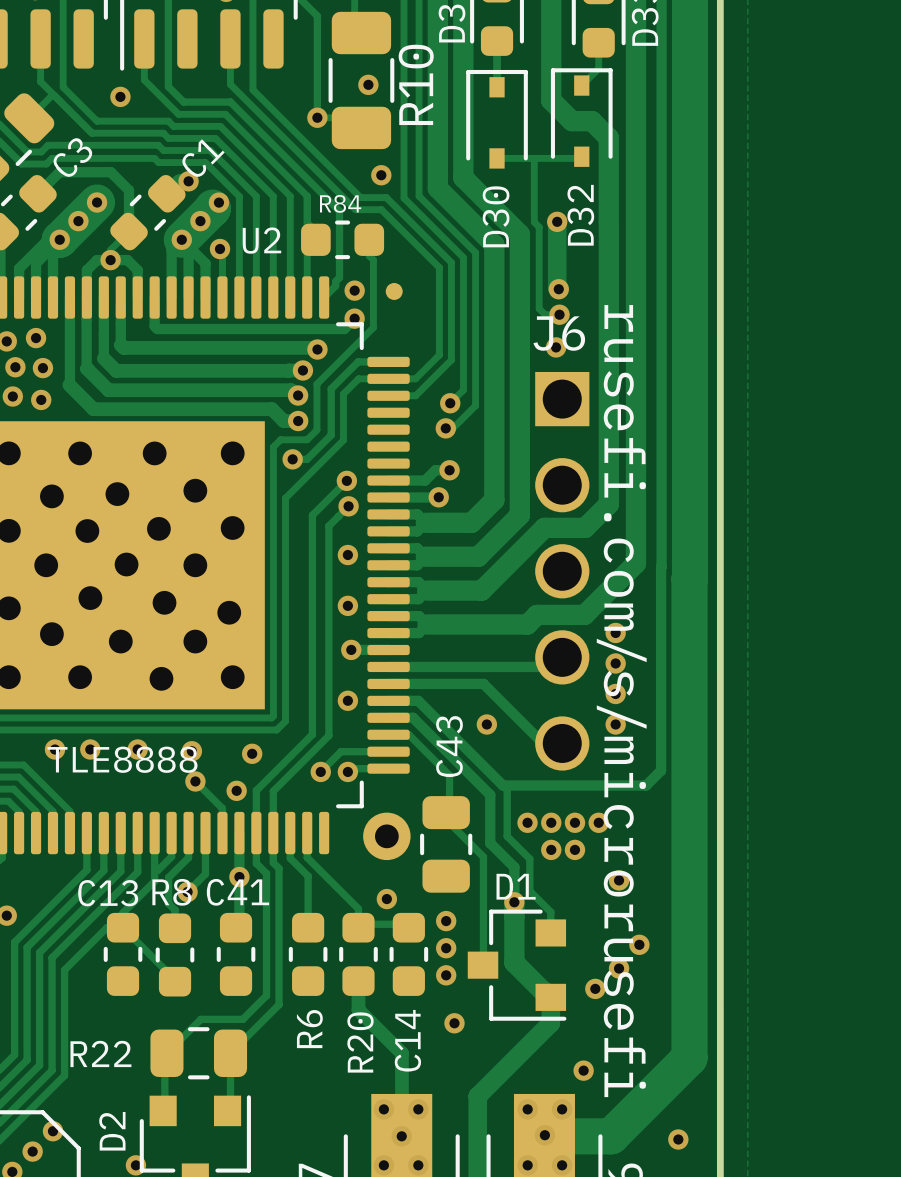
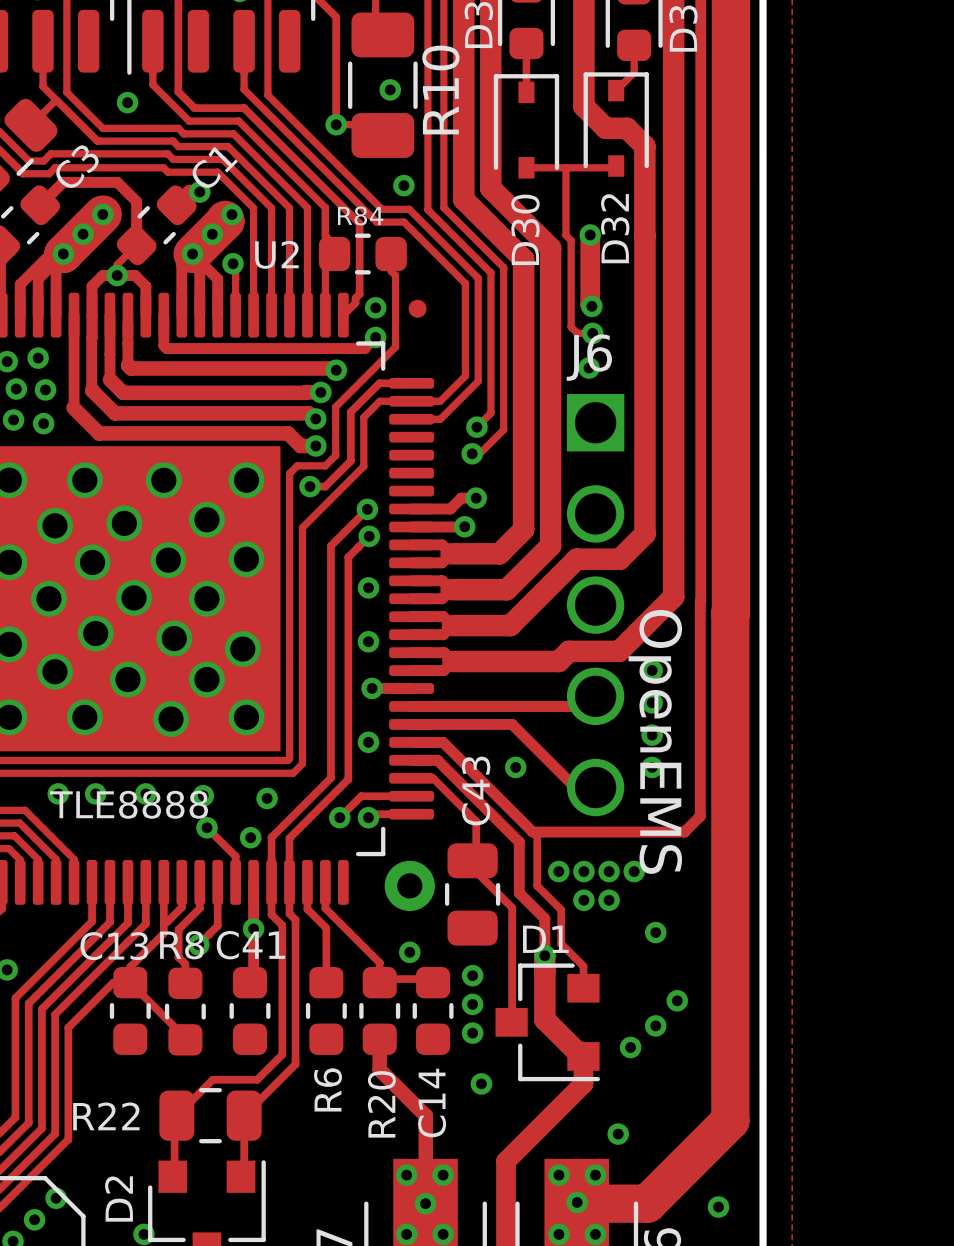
text: rusefi.com/s/microrusefi (621, 701) -> OpenEMS (655, 741)

